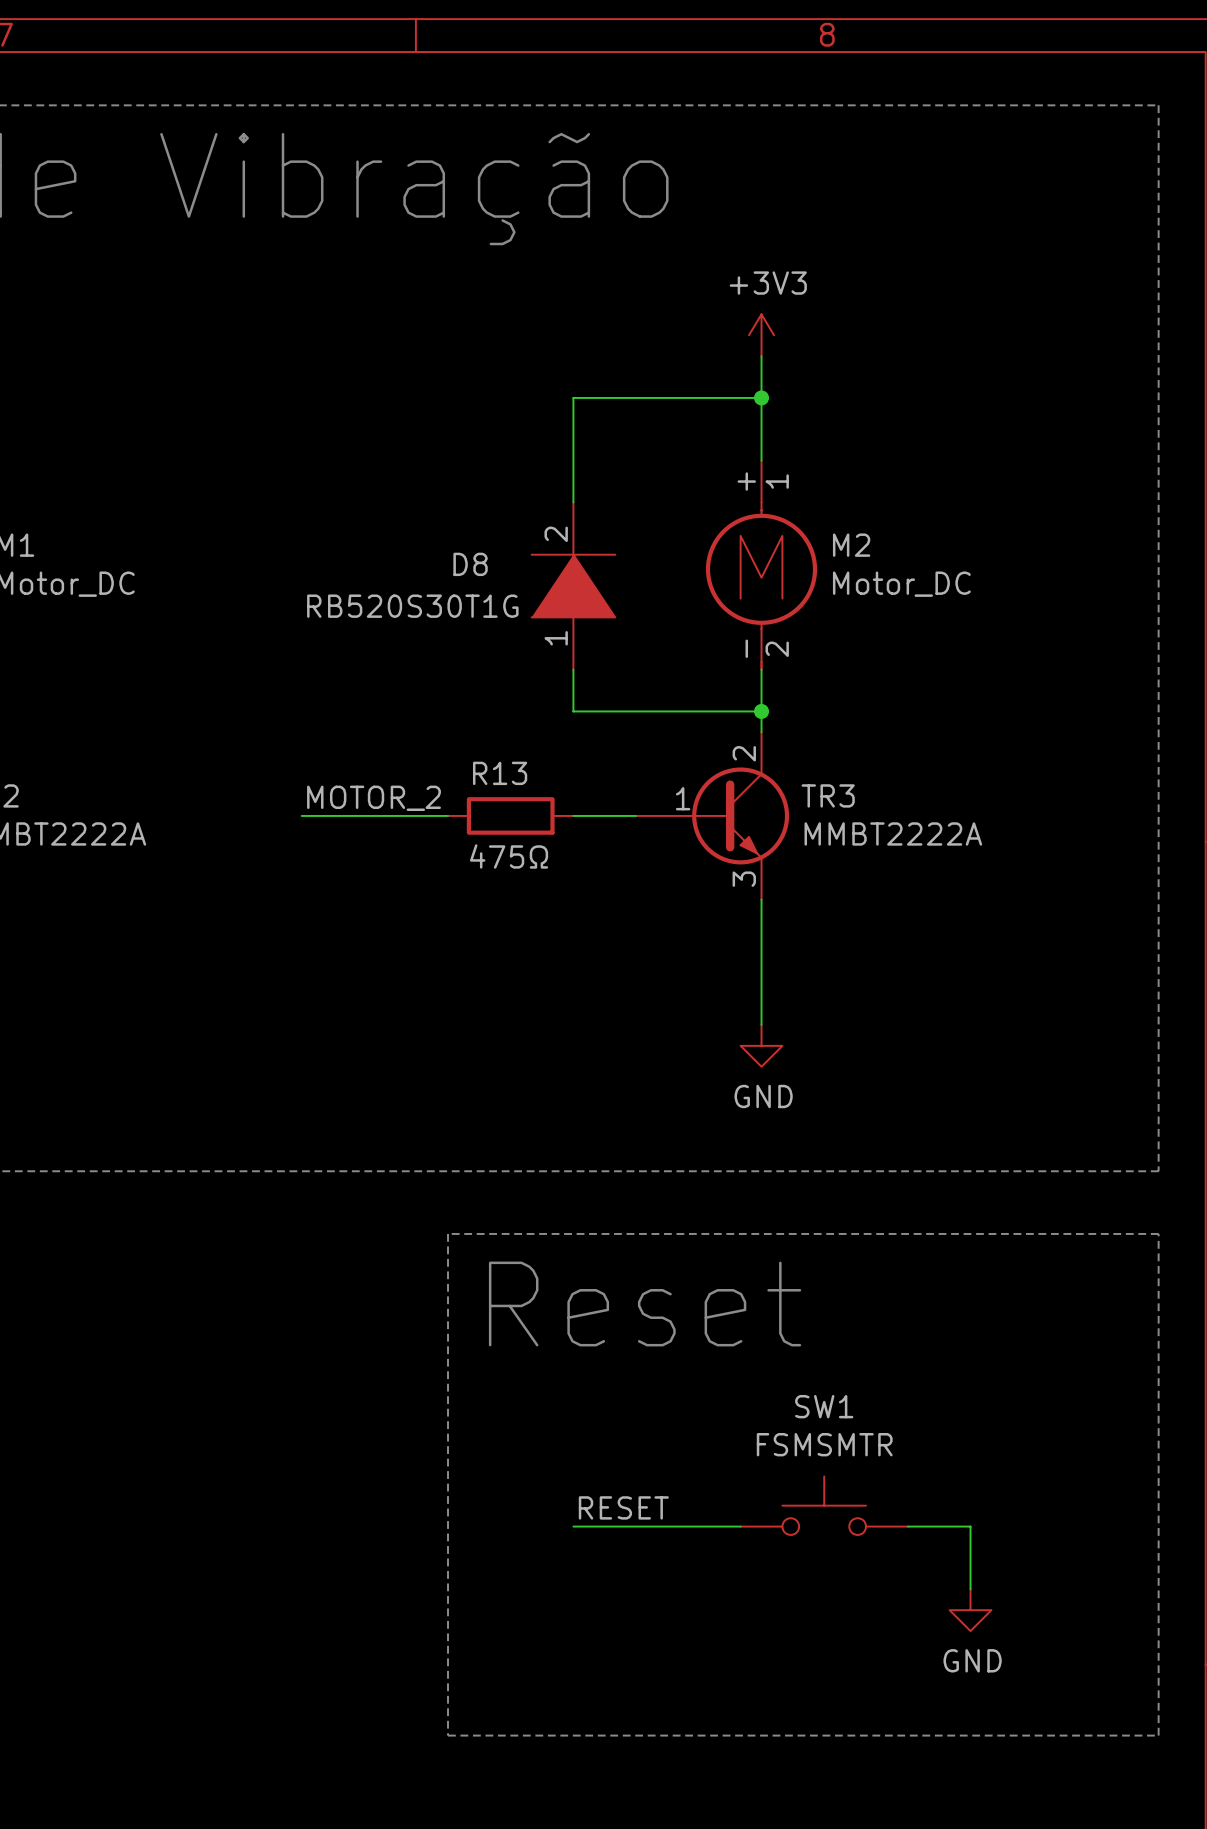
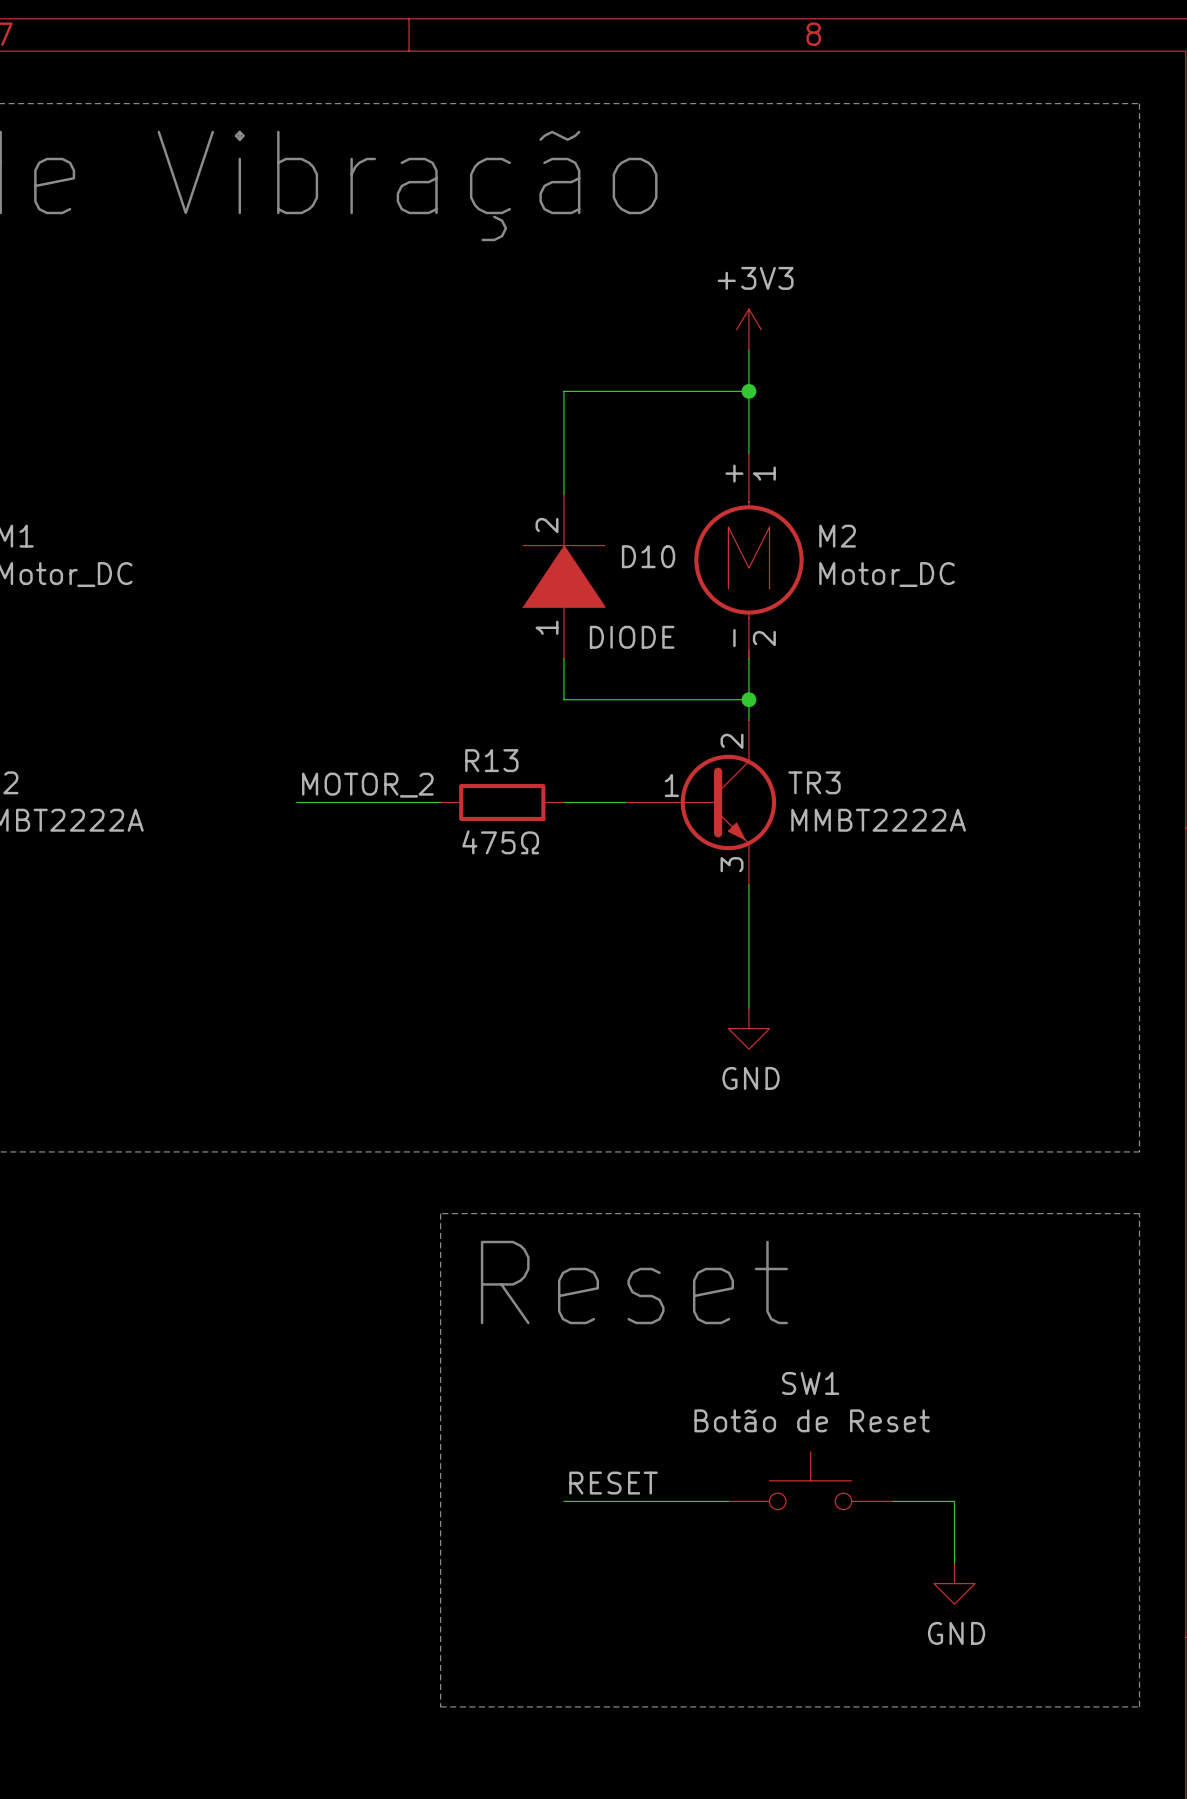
D8 name: D8 (470, 564) -> D10 (648, 556)
D8 value: RB520S30T1G (412, 606) -> DIODE (632, 637)
SW1 value: FSMSMTR (824, 1444) -> Botão de Reset (812, 1420)

